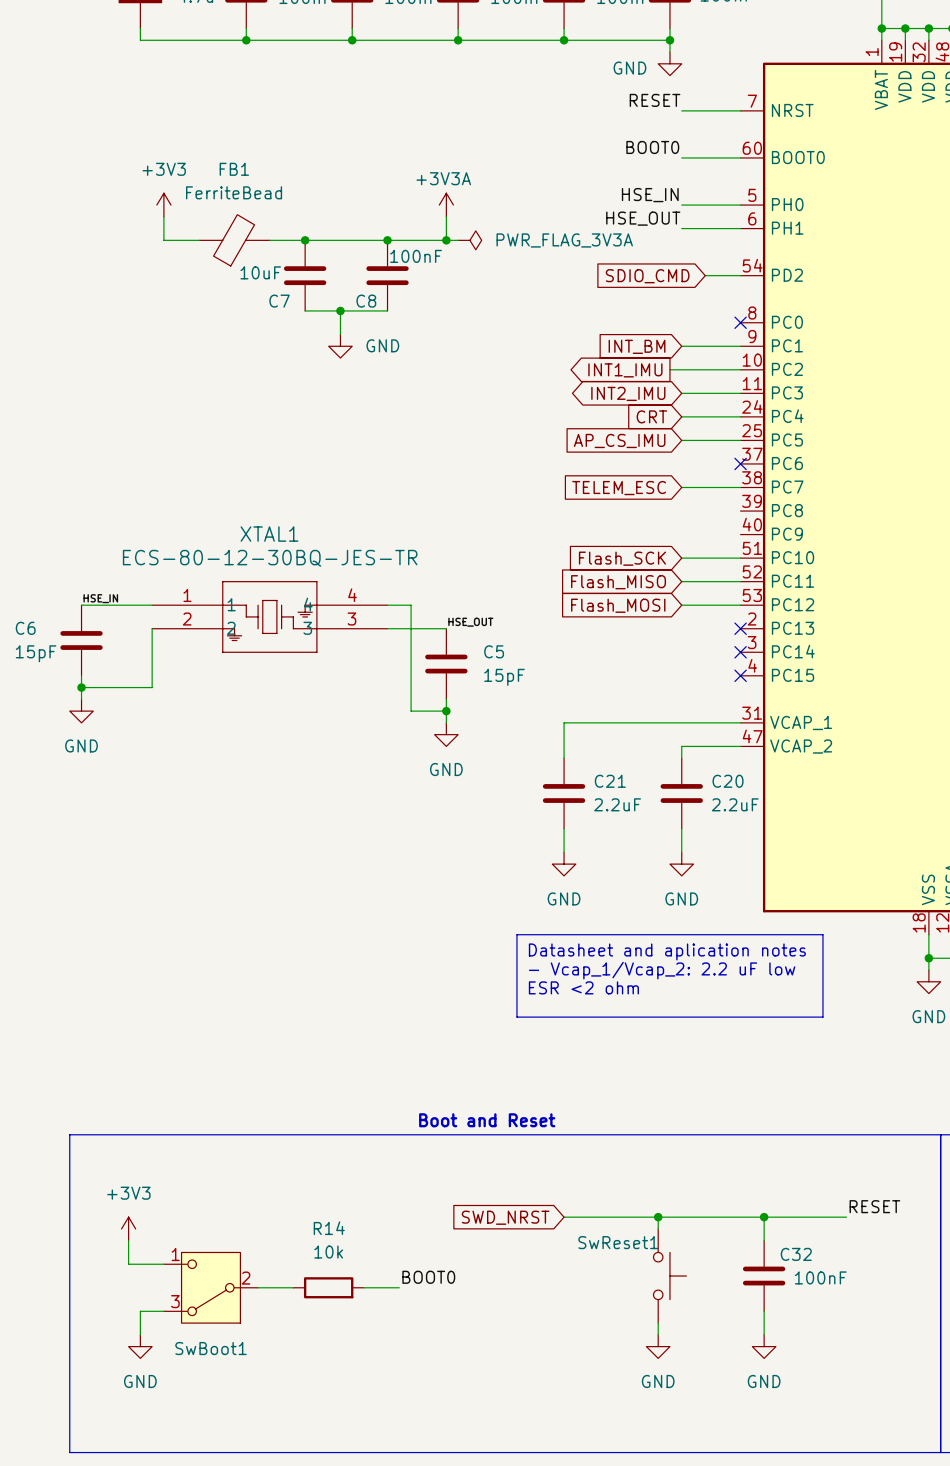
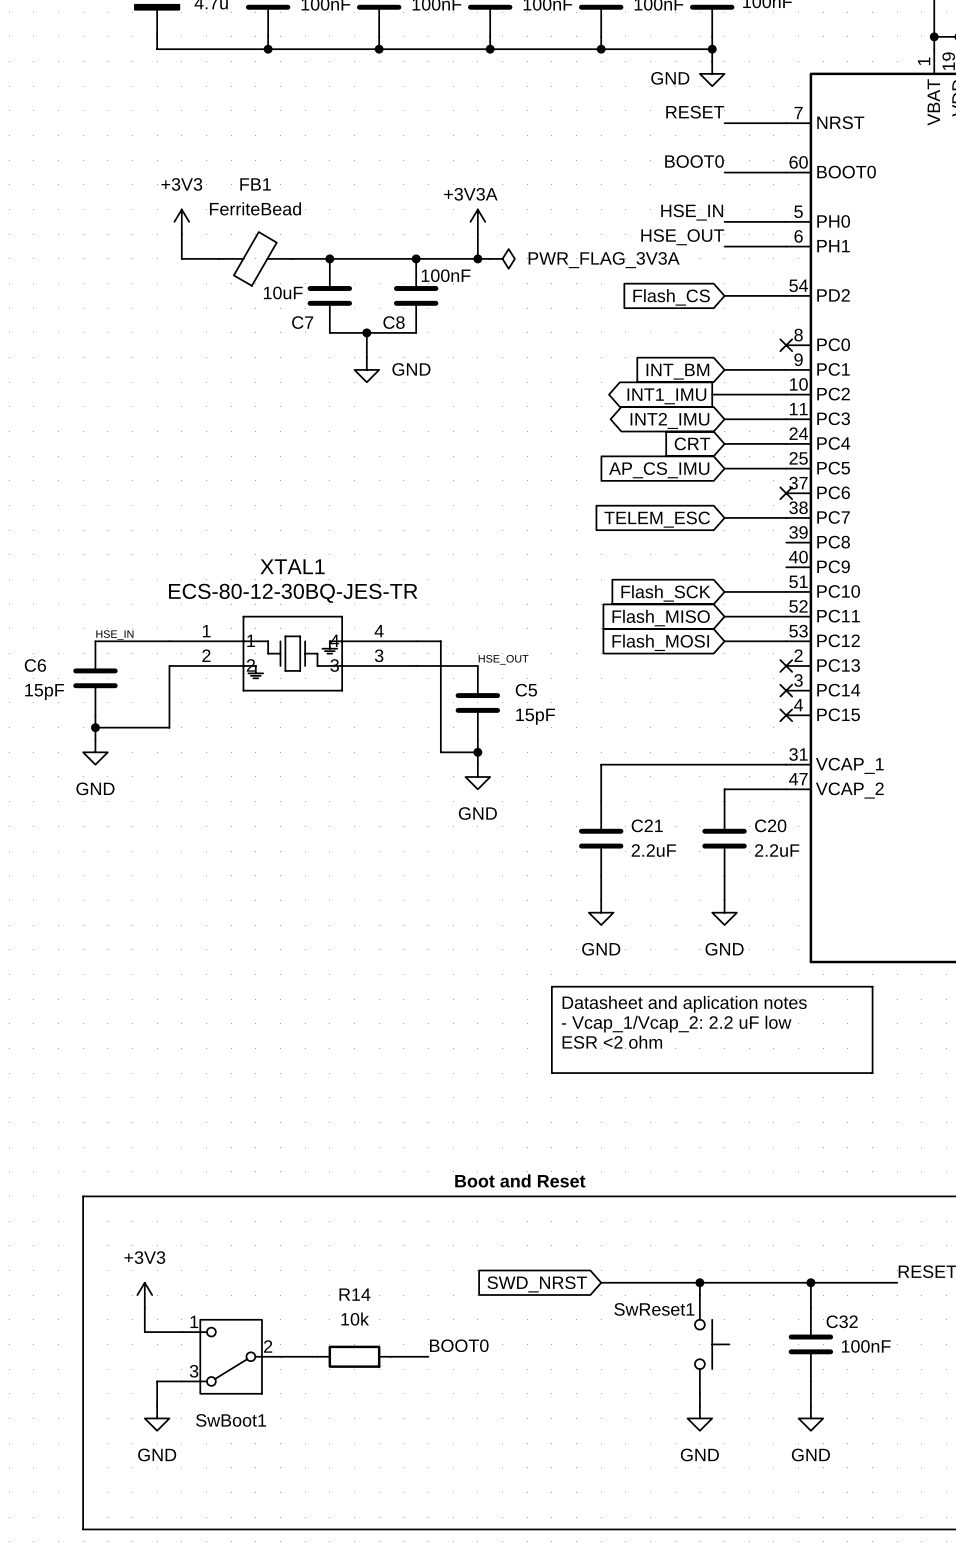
wire: none -> (724, 295) (749, 295)
global label: none -> Flash_CS (671, 297)
global label: SDIO_CMD (647, 276) -> none

